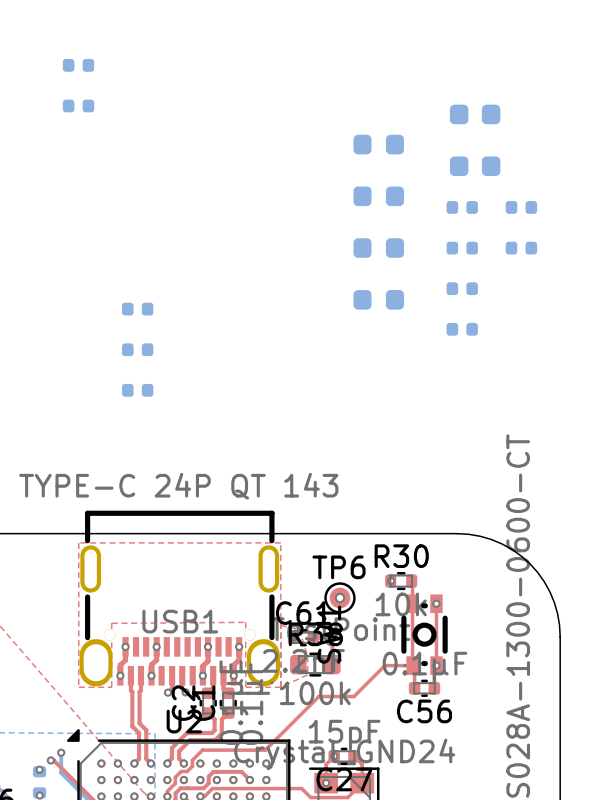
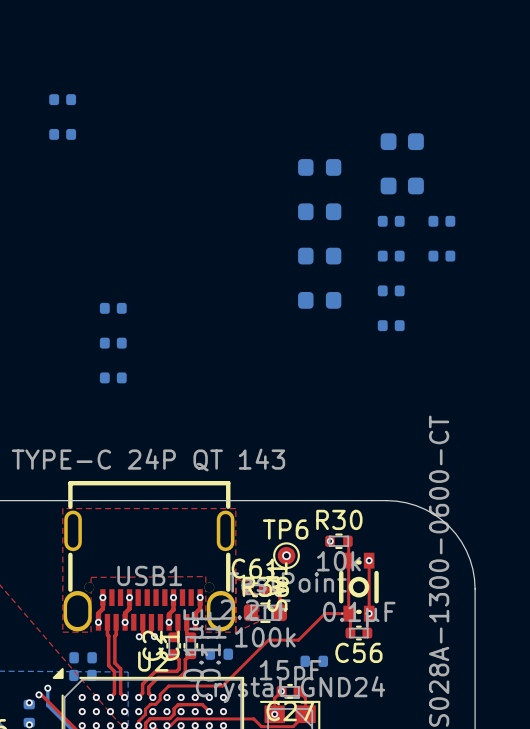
part: none -> (219, 654)
part: none -> (83, 657)
part: none -> (314, 661)
part: none -> (82, 675)

